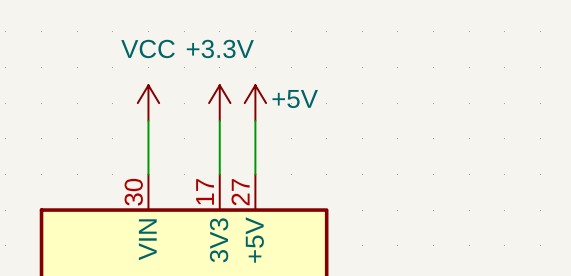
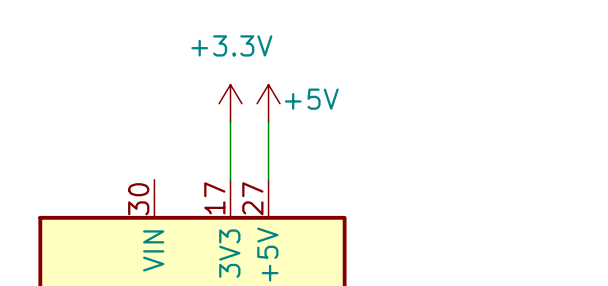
power symbol: VCC (148, 103) -> none
wire: (148, 120) (148, 174) -> none

